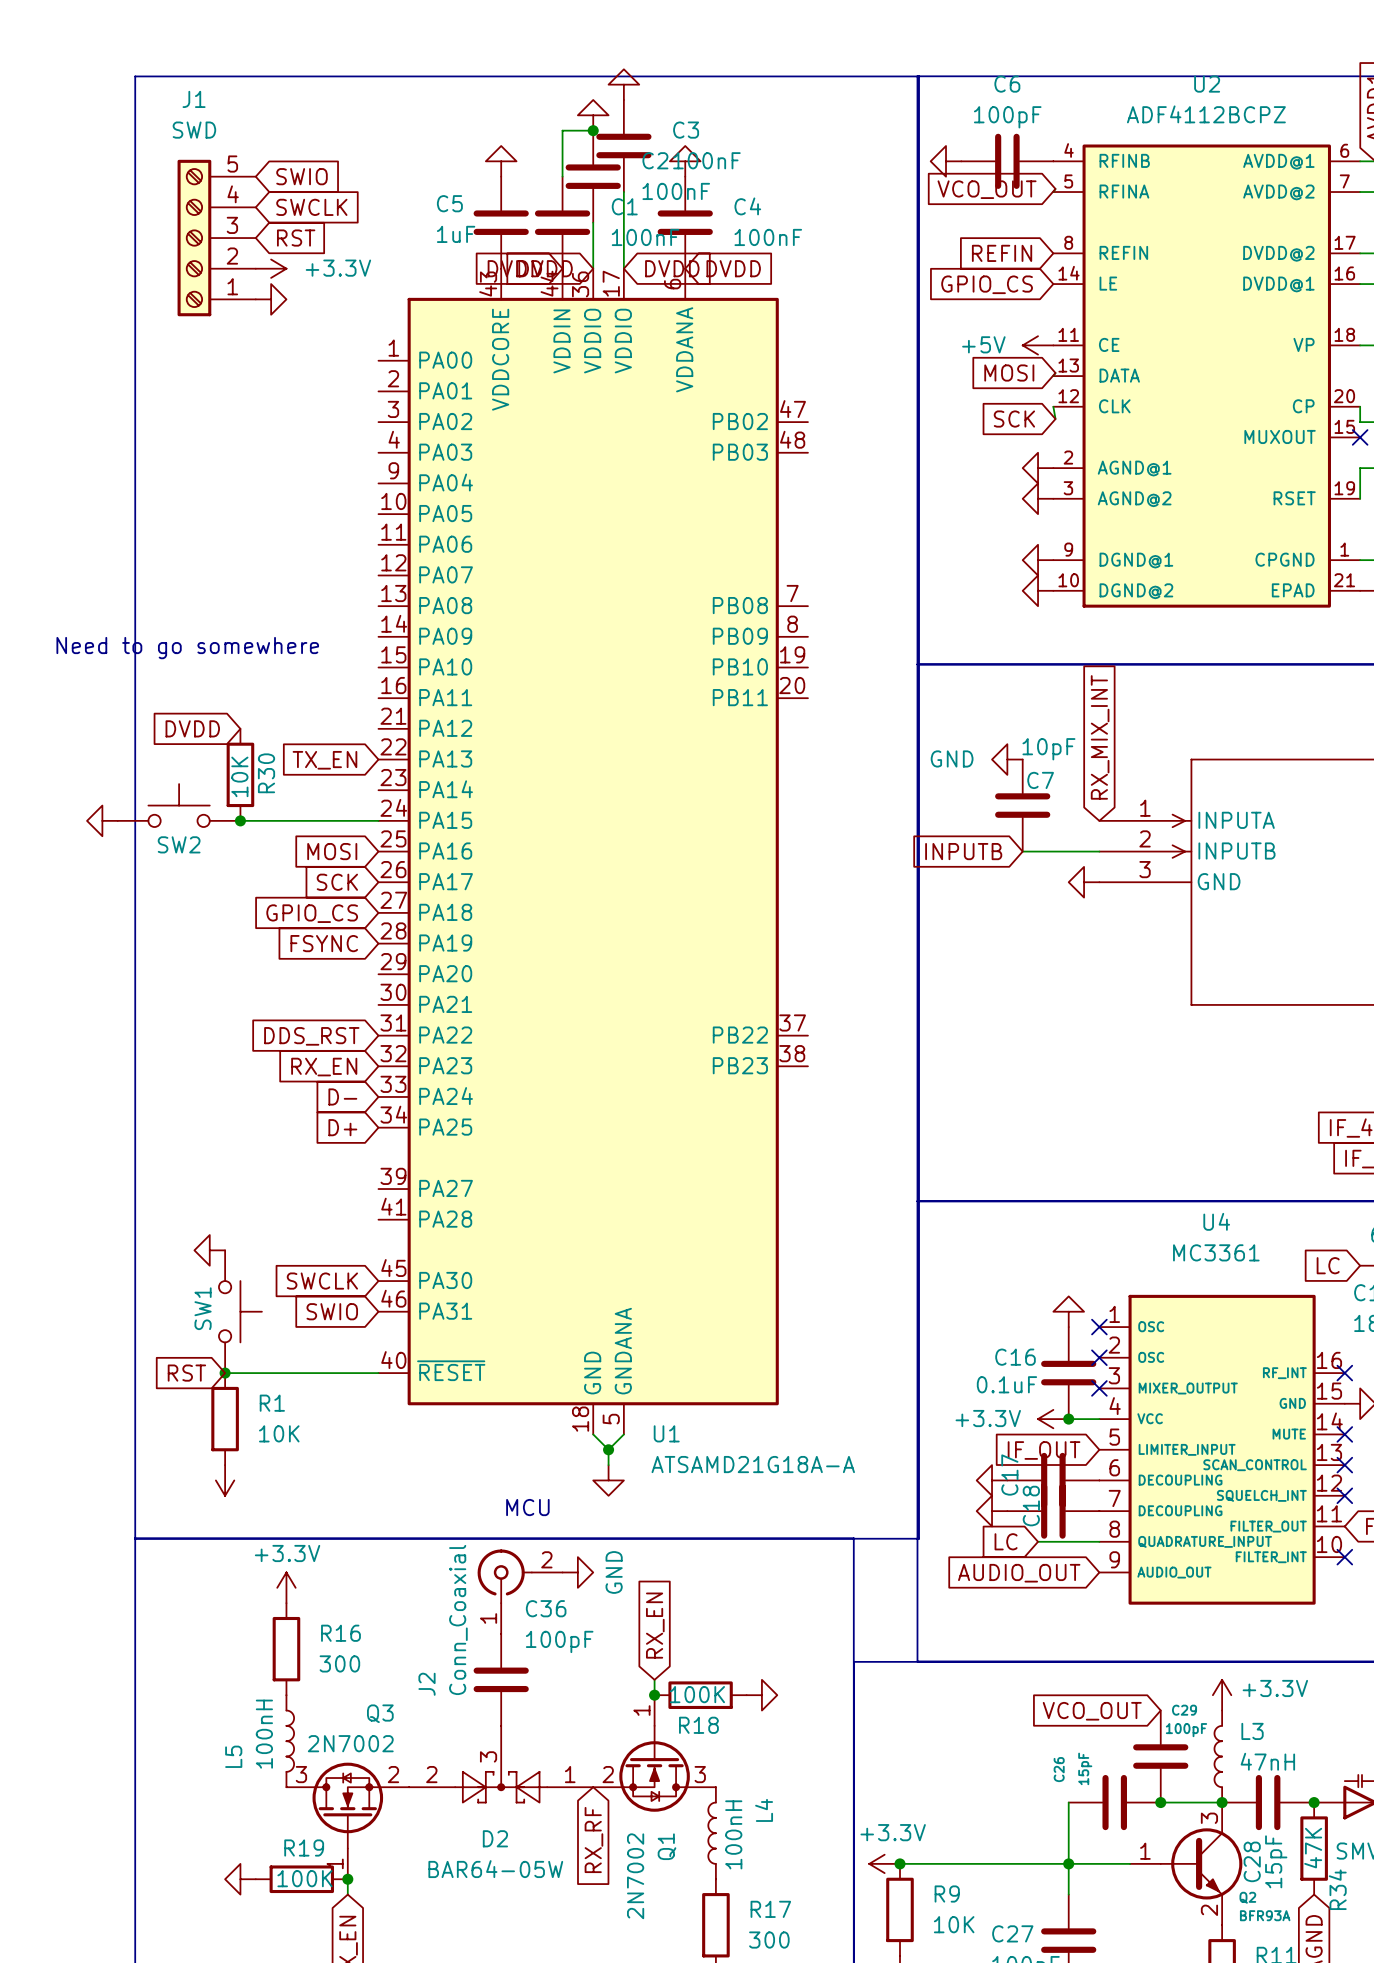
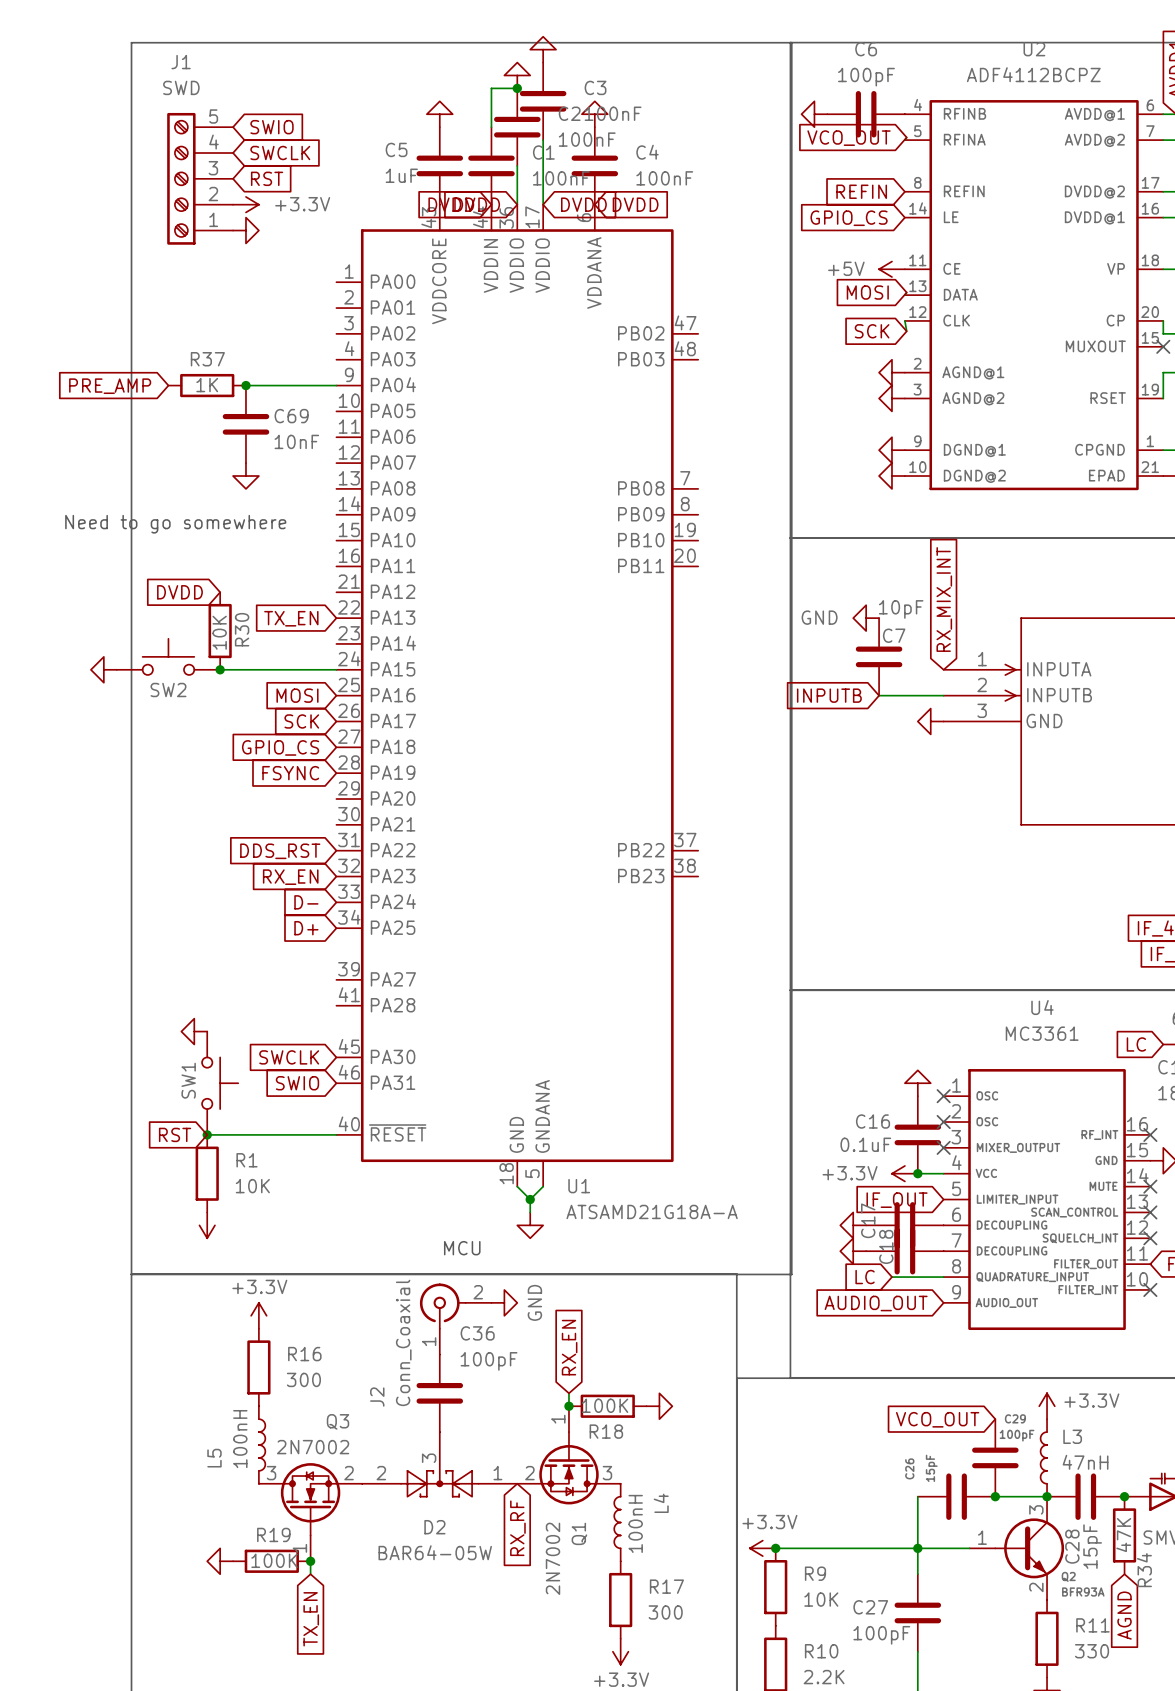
R37: none -> 1K (207, 385)
wire: none -> (245, 385) (336, 385)
junction: none -> (245, 385)
global label: none -> PRE_AMP (110, 386)
C69: none -> 10nF (245, 424)
power symbol: none -> (245, 476)

